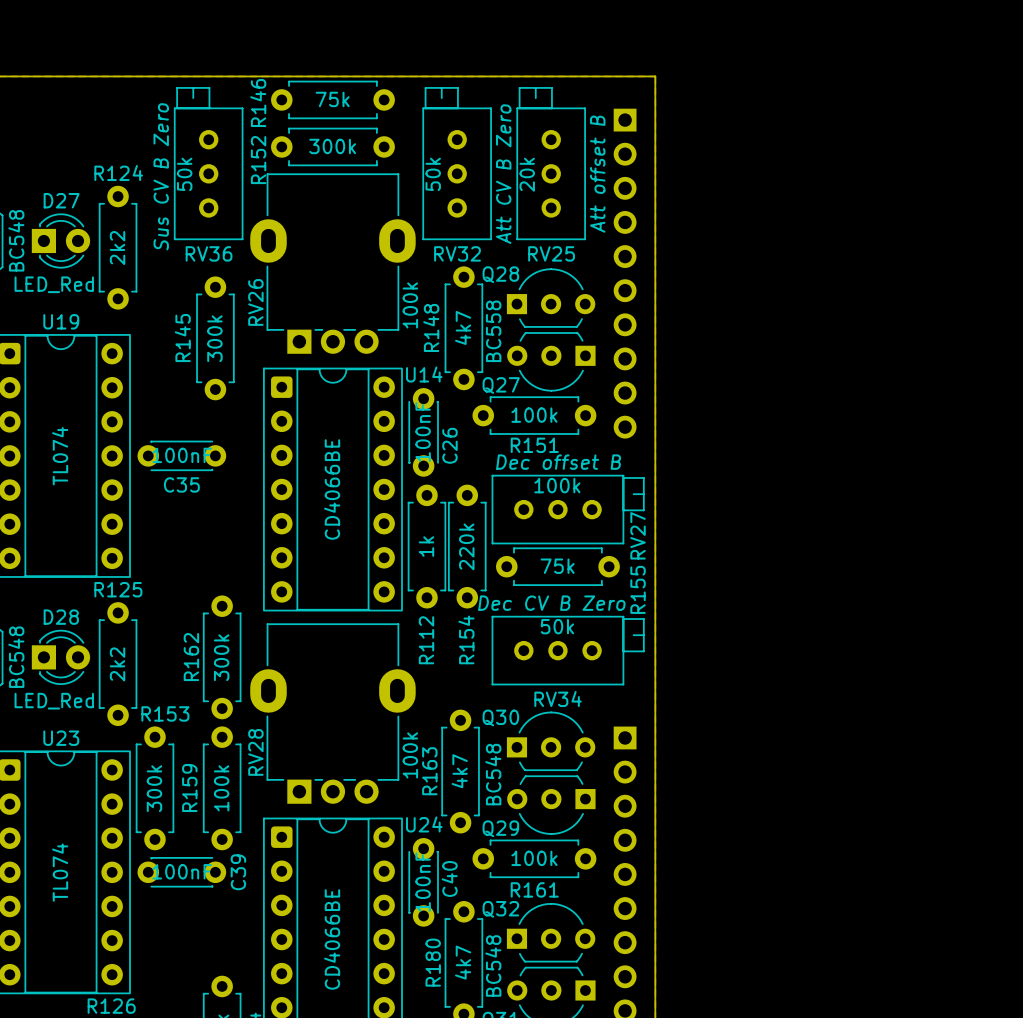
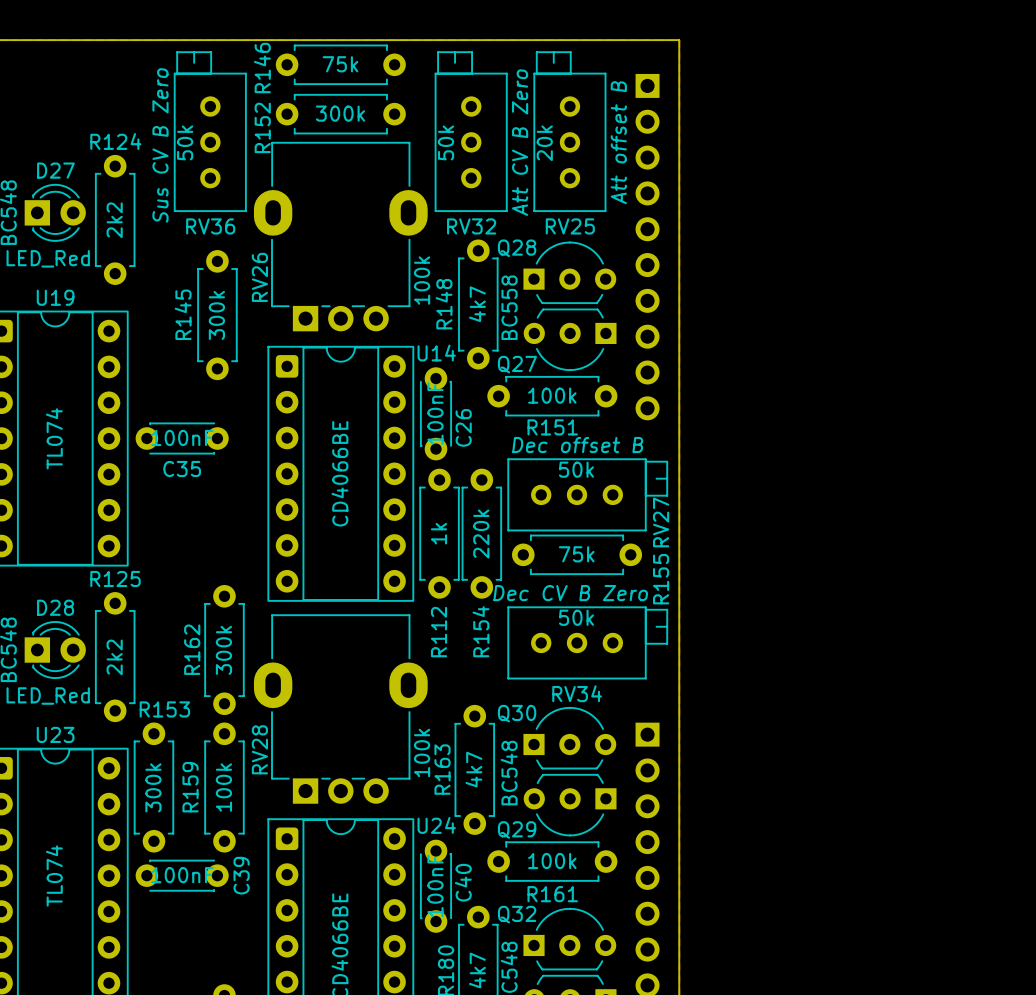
RV27 value: 100k (557, 485) -> 50k (576, 469)

